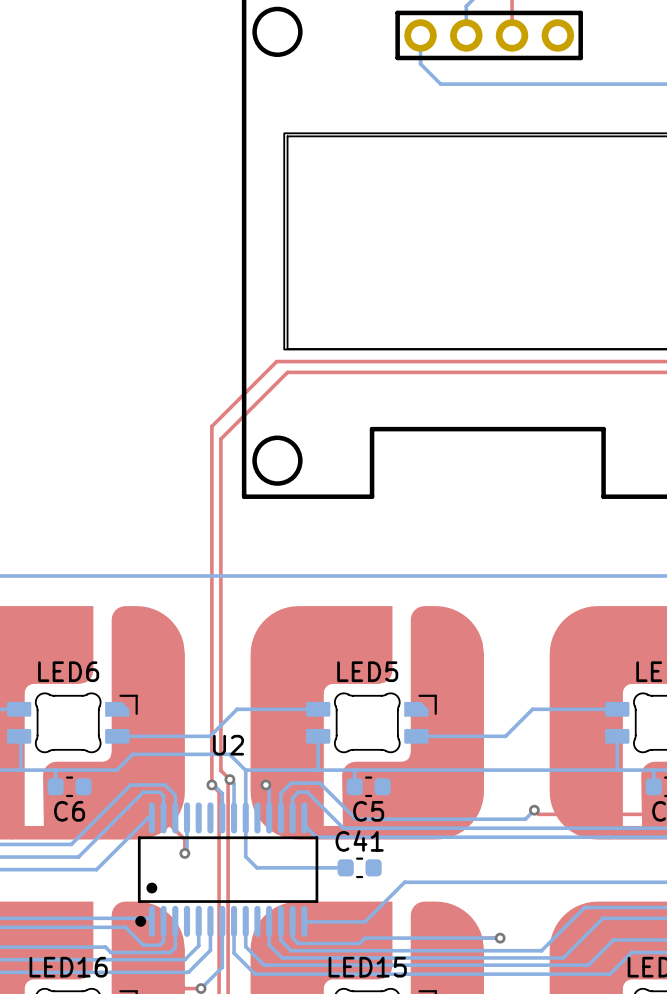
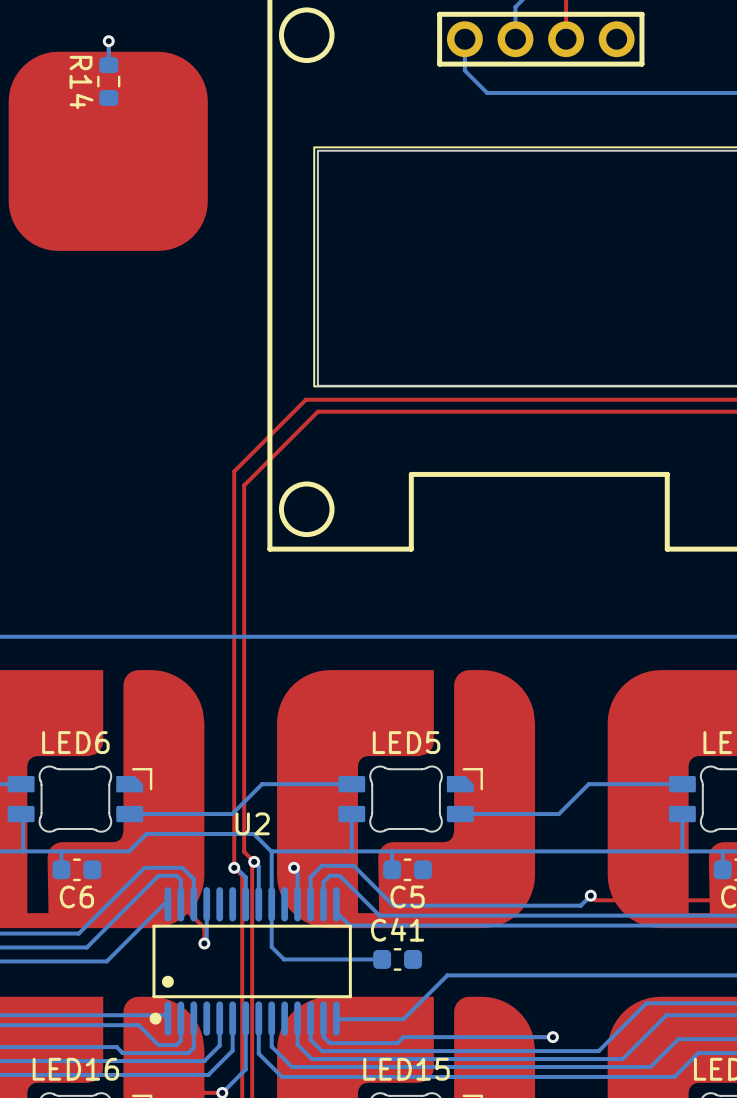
bottom track: none -> (108, 41) (108, 56)
via: none -> (108, 41)
R14: none -> (108, 81)
part: none -> (108, 151)

